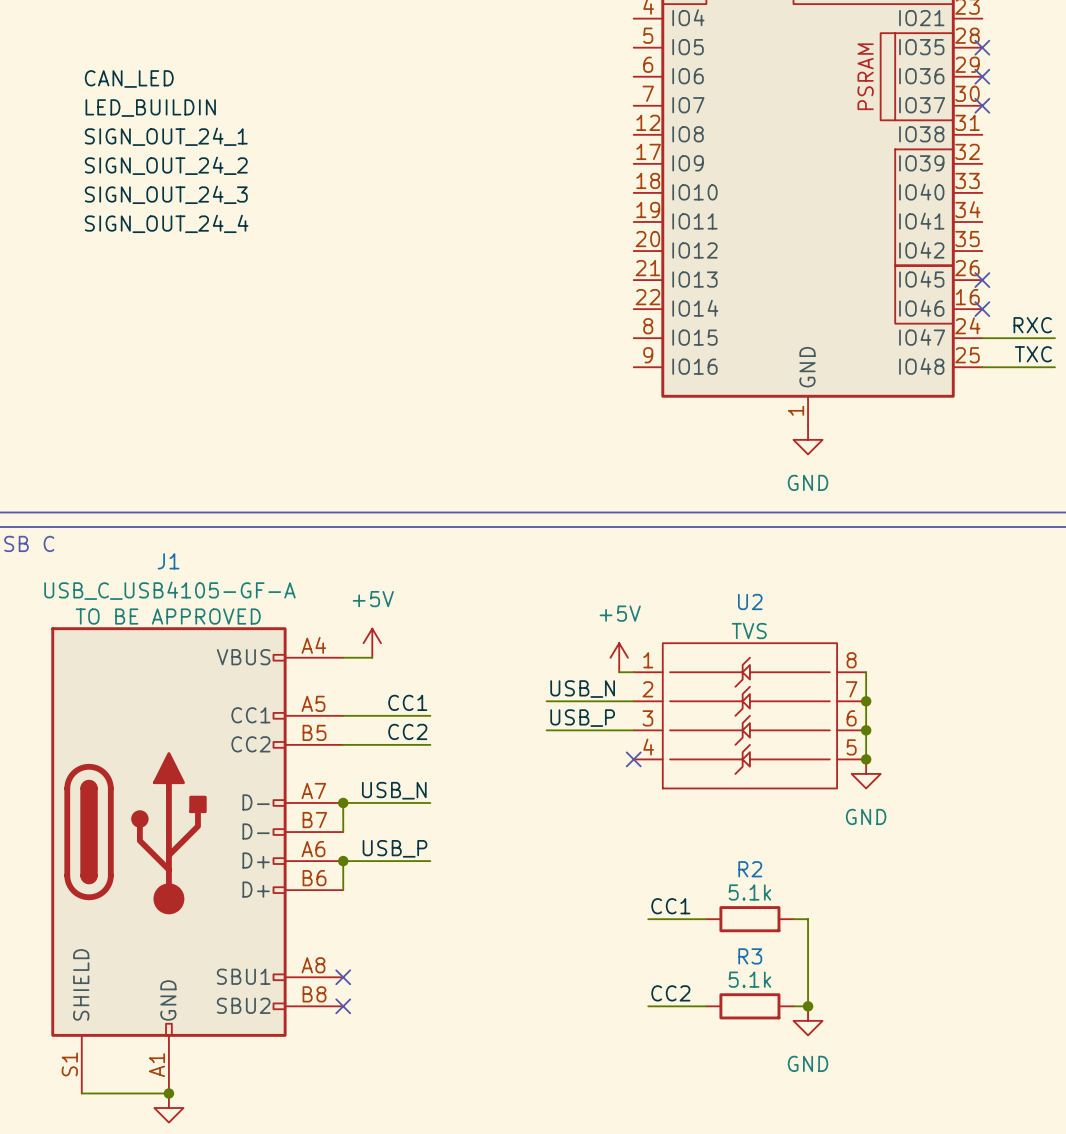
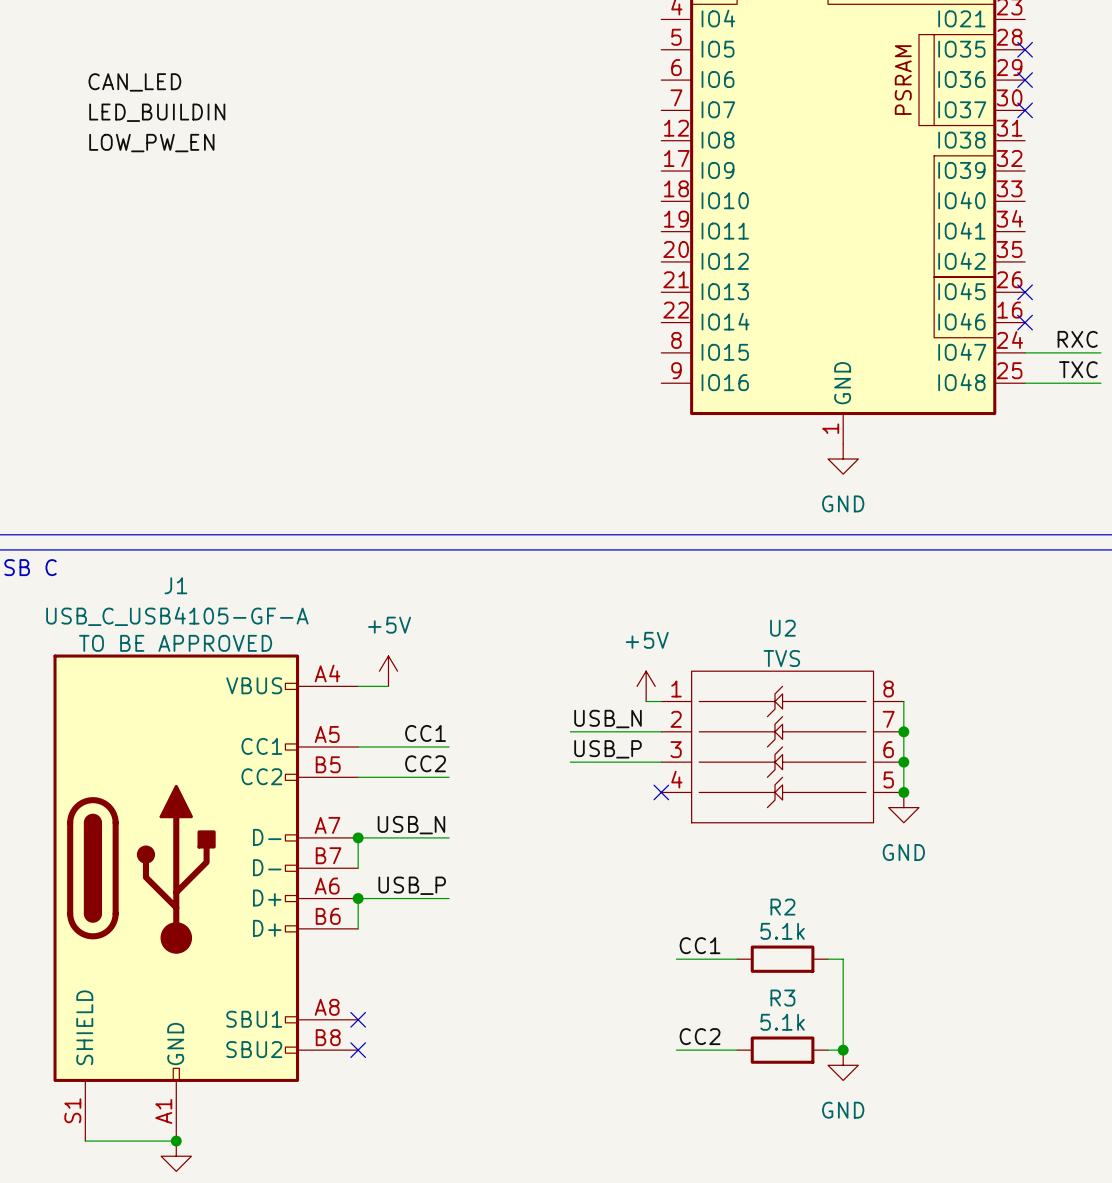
label: SIGN_OUT_24_1 (166, 136) -> LOW_PW_EN (151, 143)
label: SIGN_OUT_24_2 (166, 165) -> none
label: SIGN_OUT_24_3 (166, 194) -> none
label: SIGN_OUT_24_4 (166, 223) -> none

